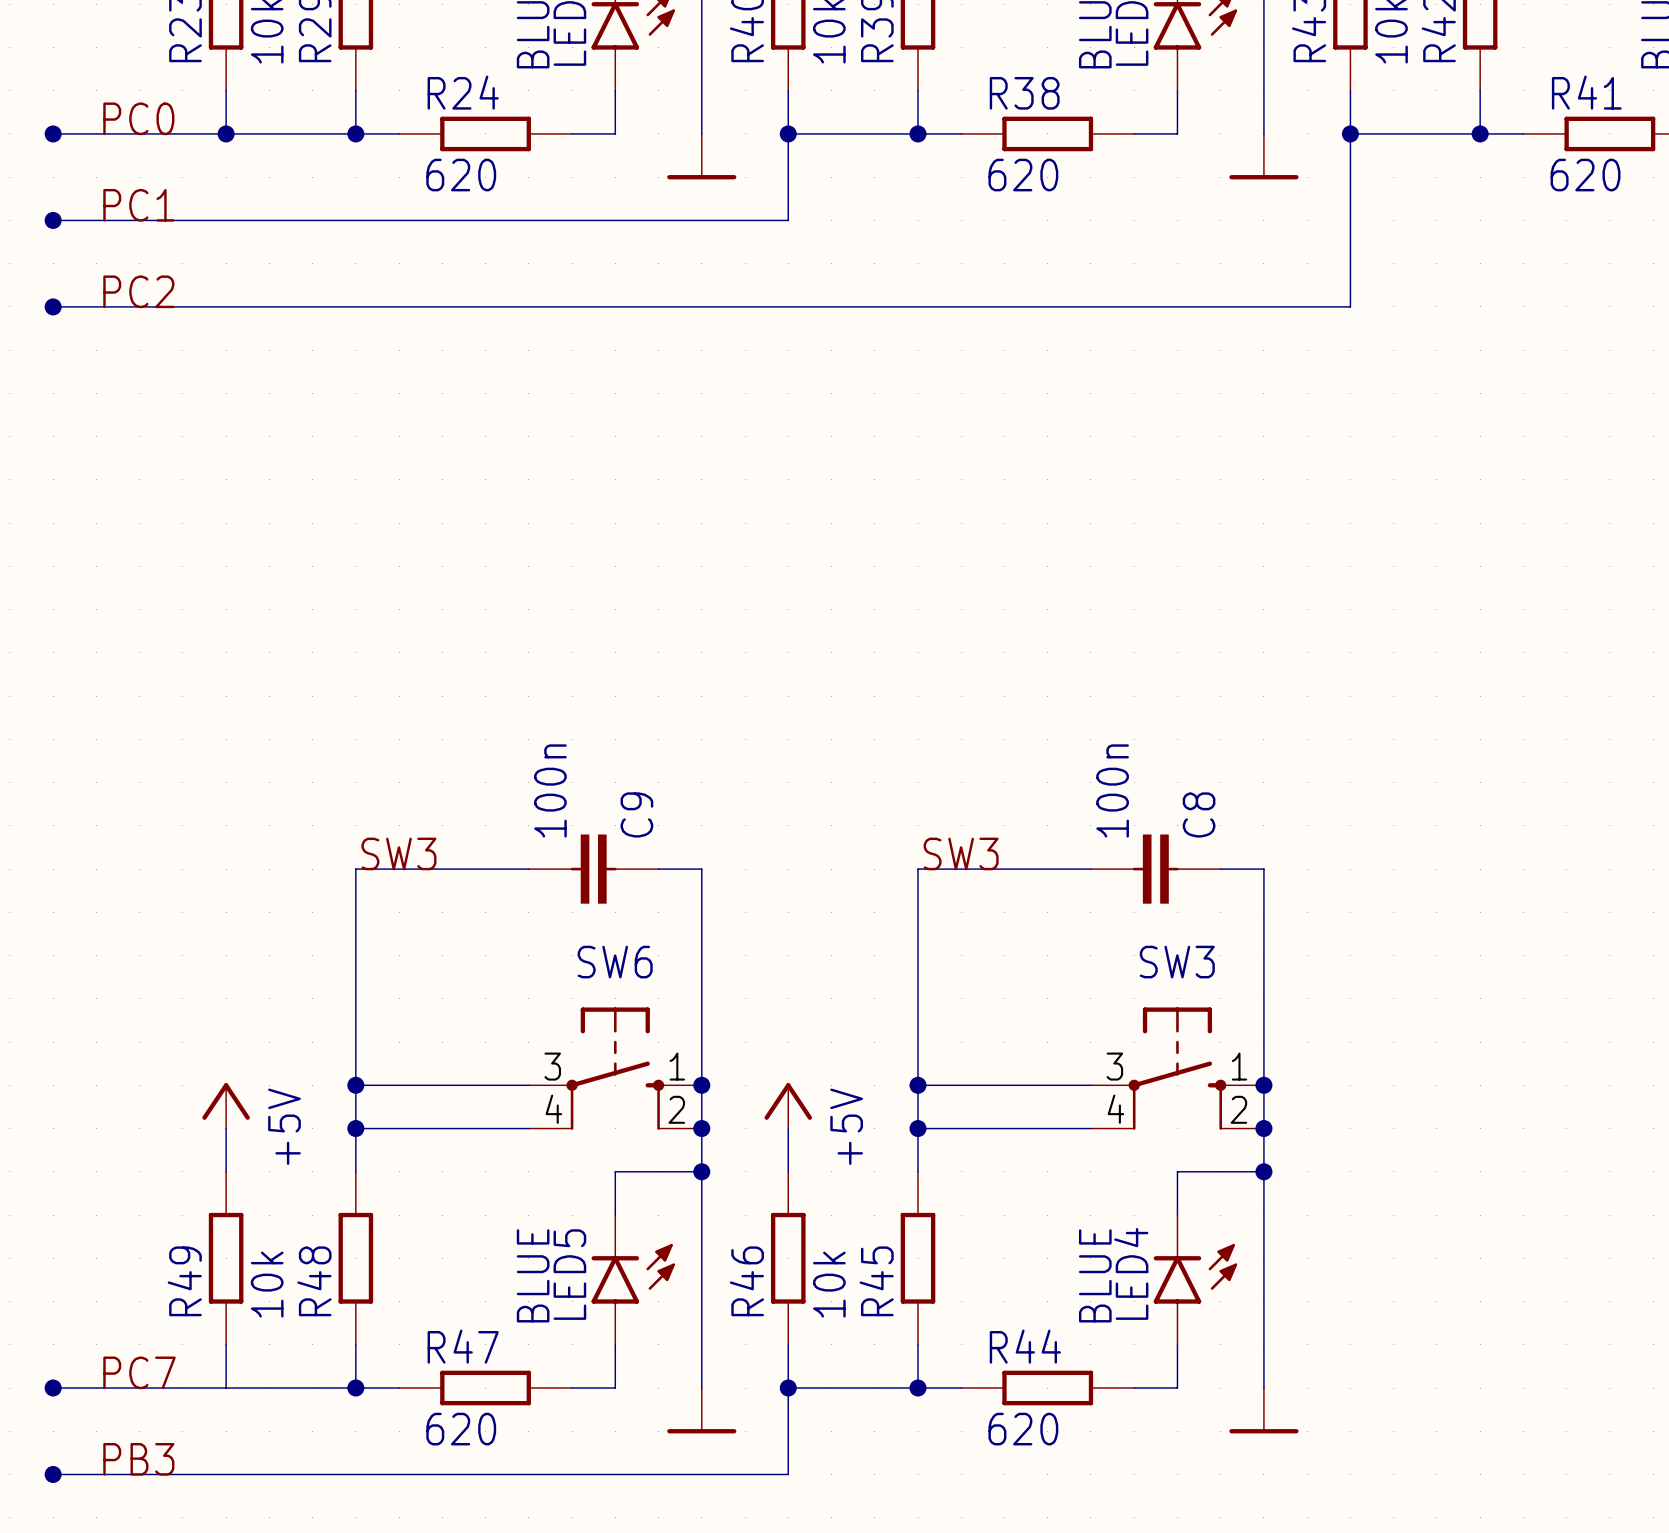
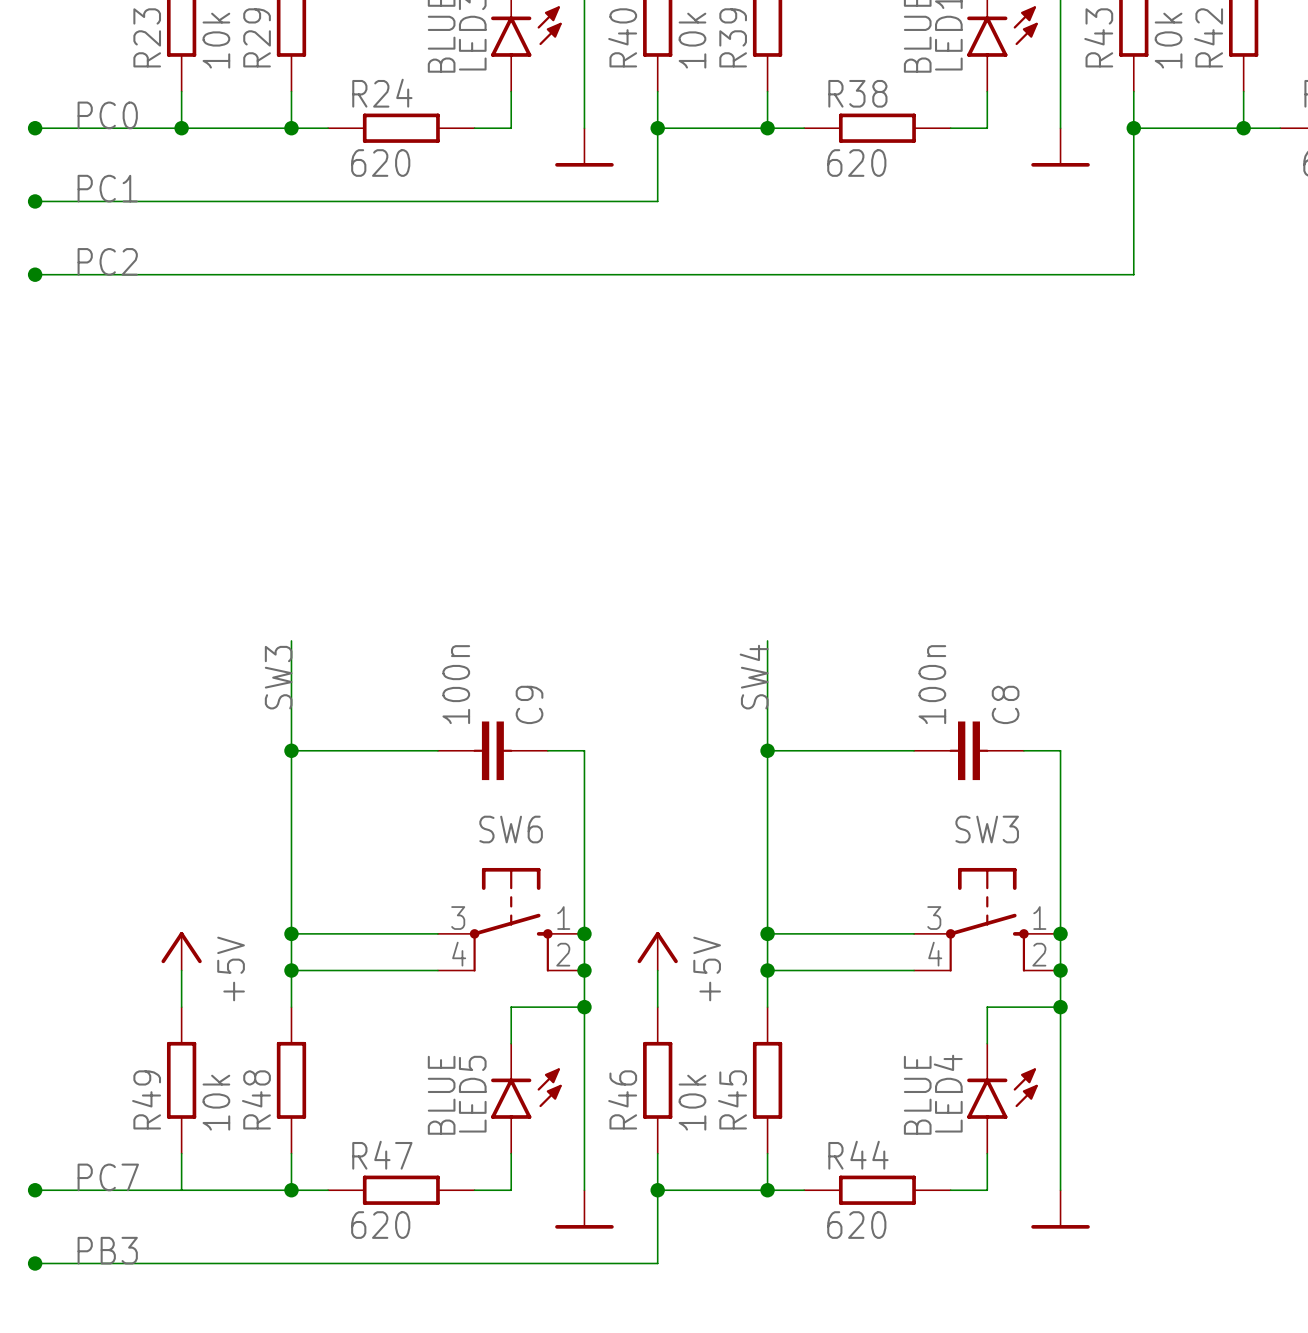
wire: none -> (291, 640) (291, 750)
wire: none -> (767, 640) (767, 750)
label rotation: 0° (398, 853) -> 90° counterclockwise (278, 677)
label position: SW3 (398, 853) -> SW3 (278, 677)
label: SW3 (961, 853) -> SW4 (754, 677)
junction: none -> (291, 750)
junction: none -> (767, 750)

